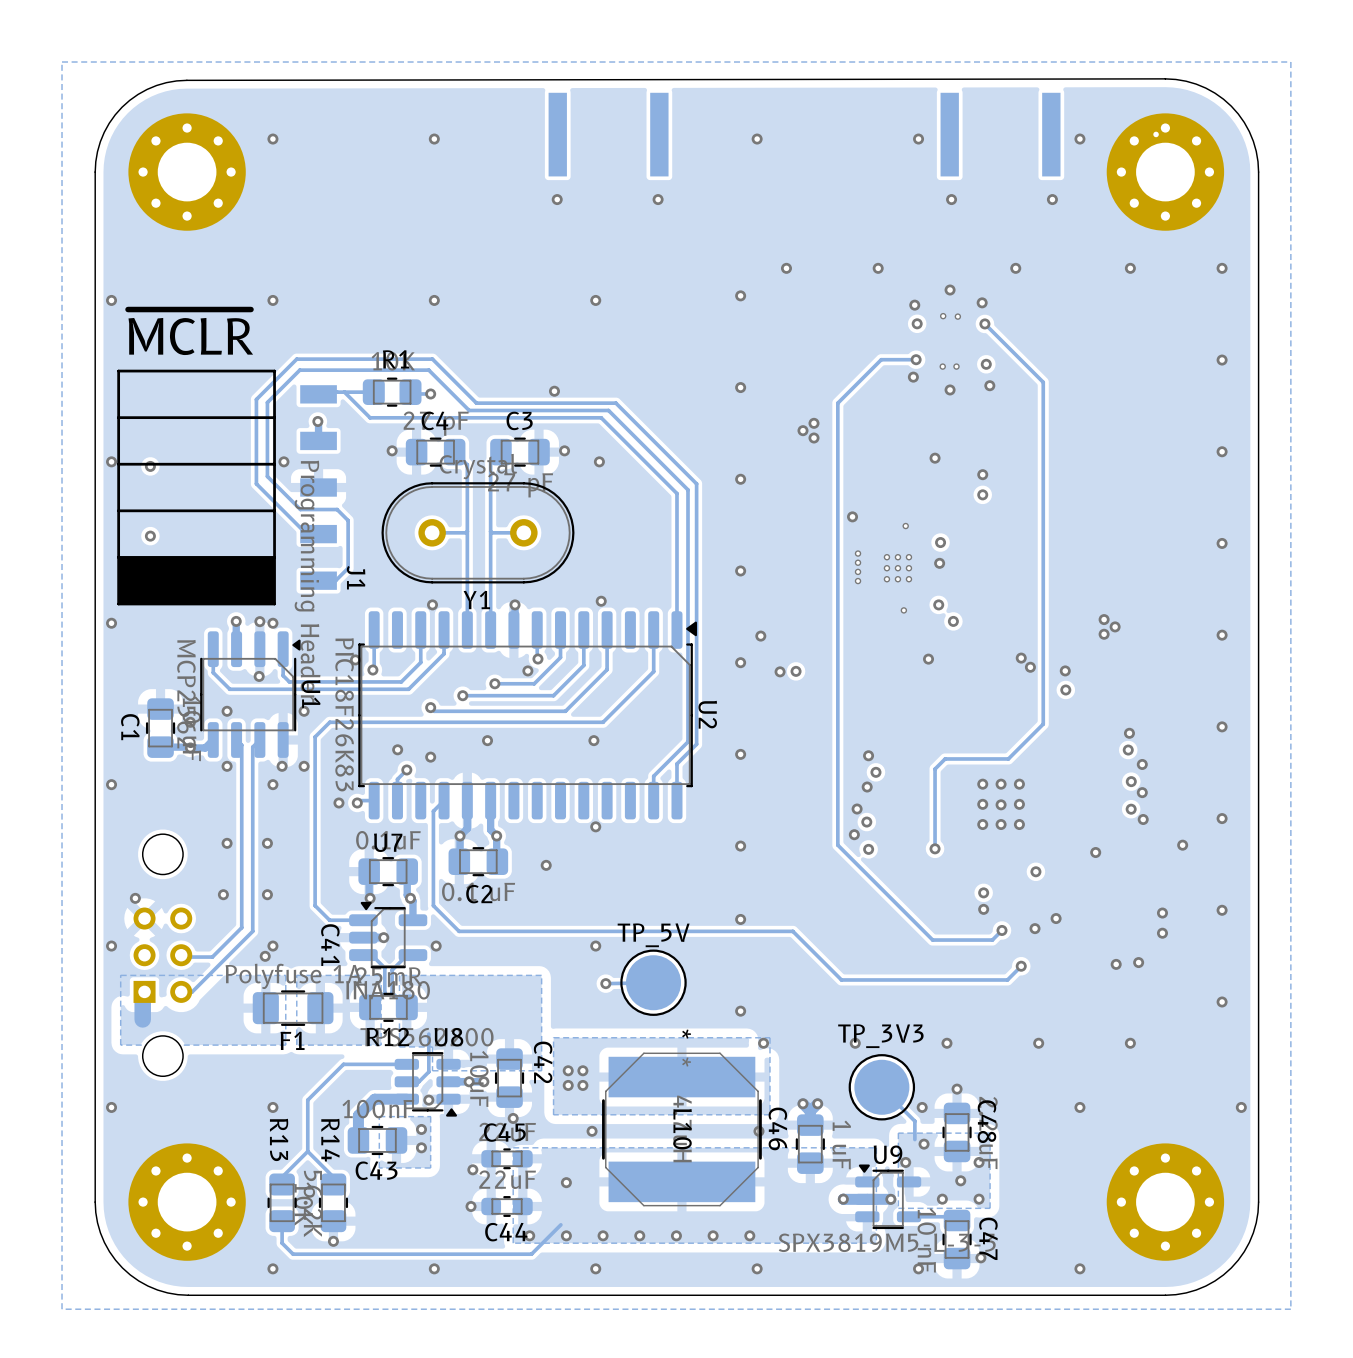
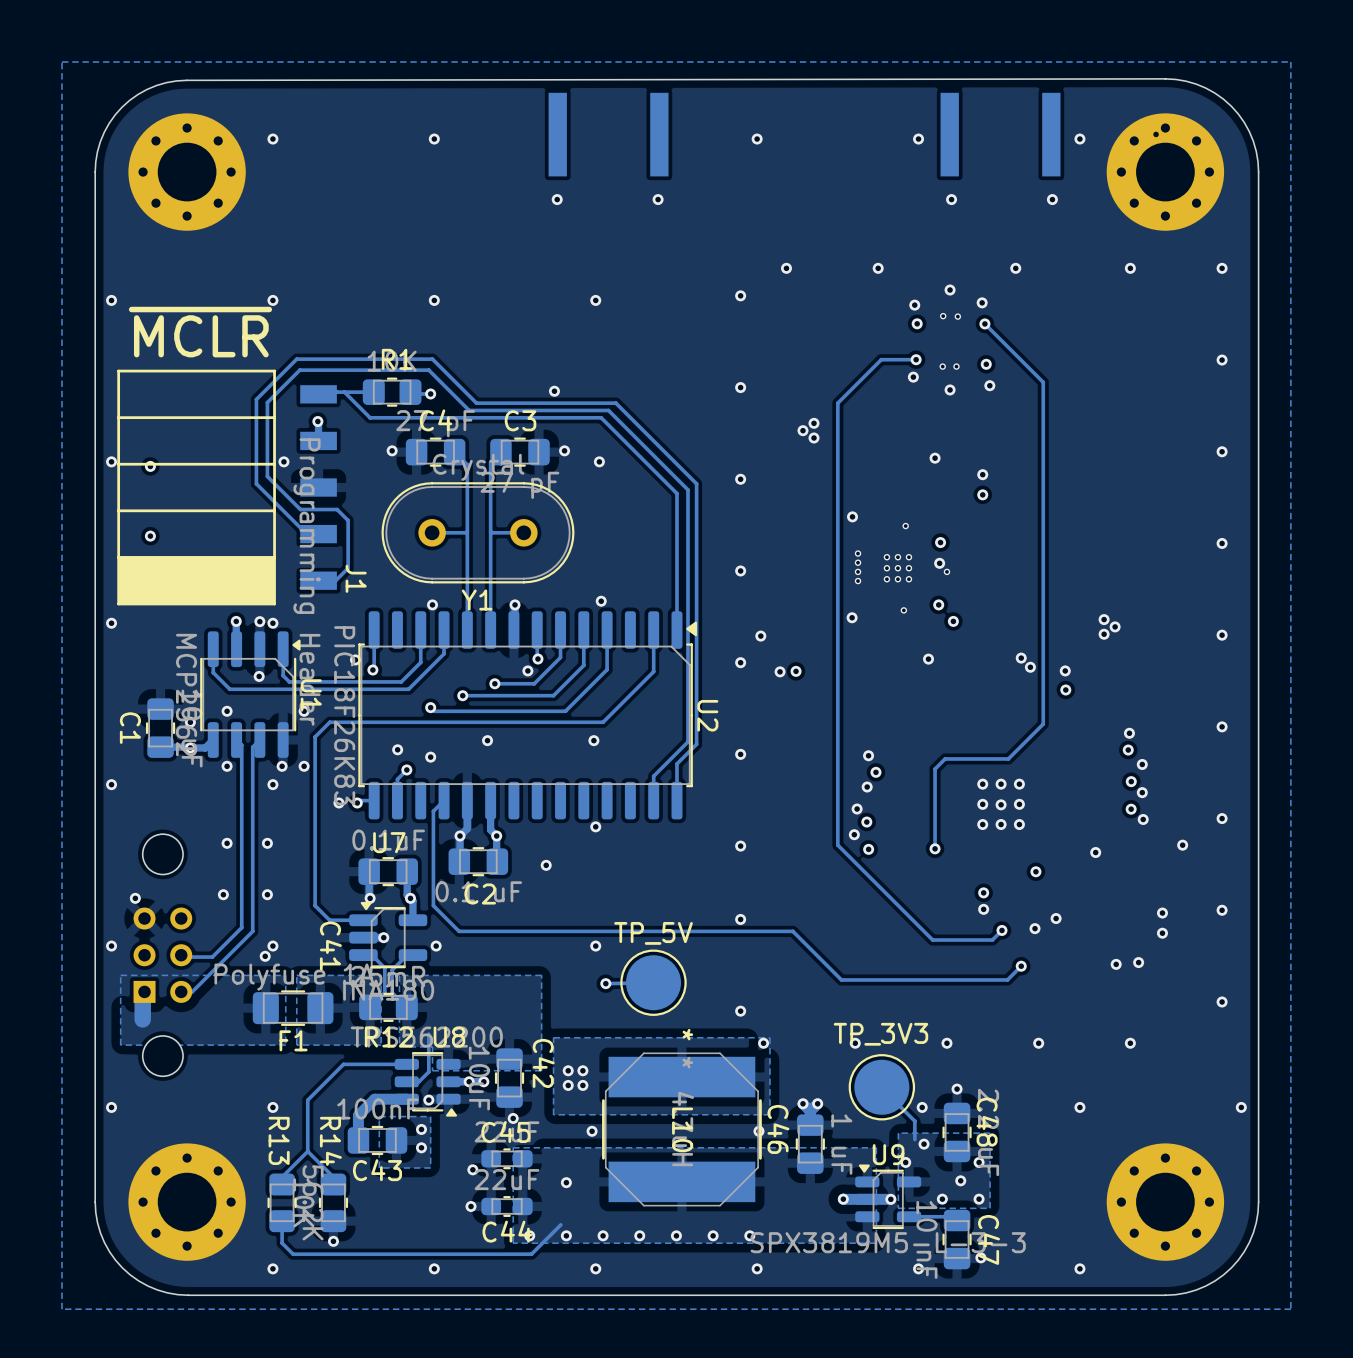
via: none -> (946, 571)
via: none -> (852, 617)

